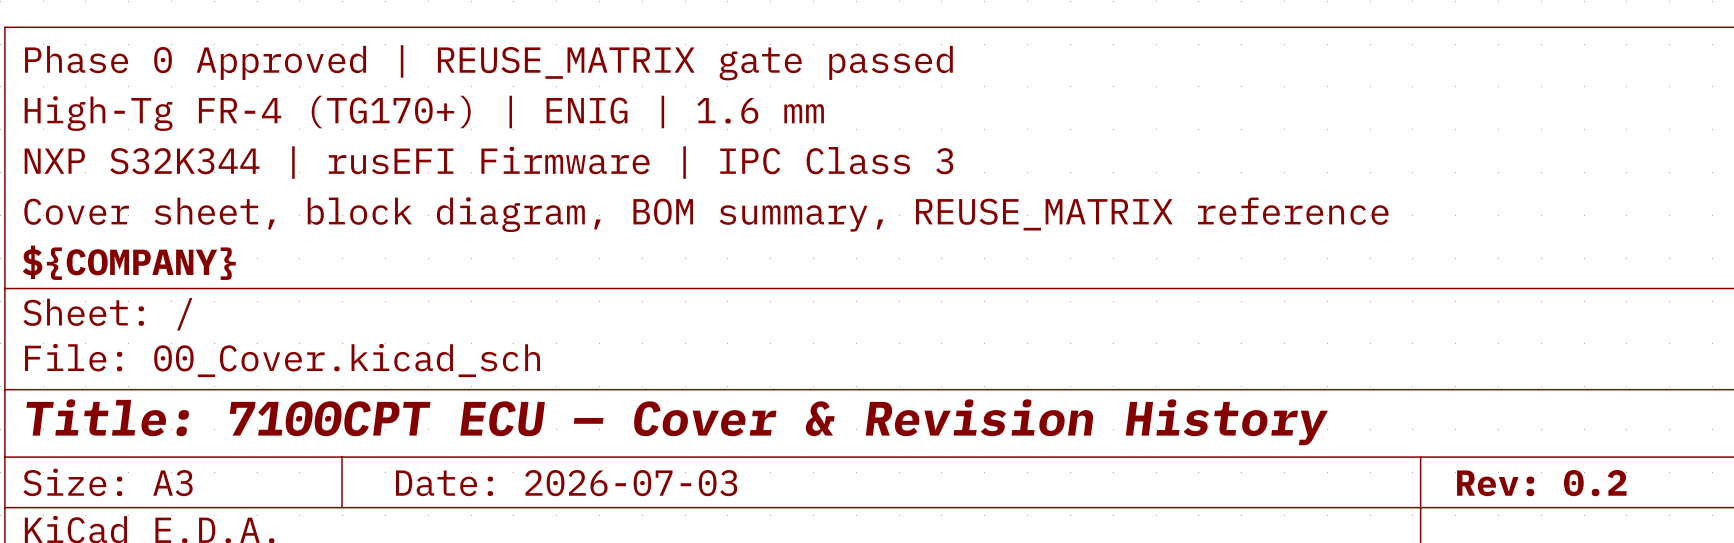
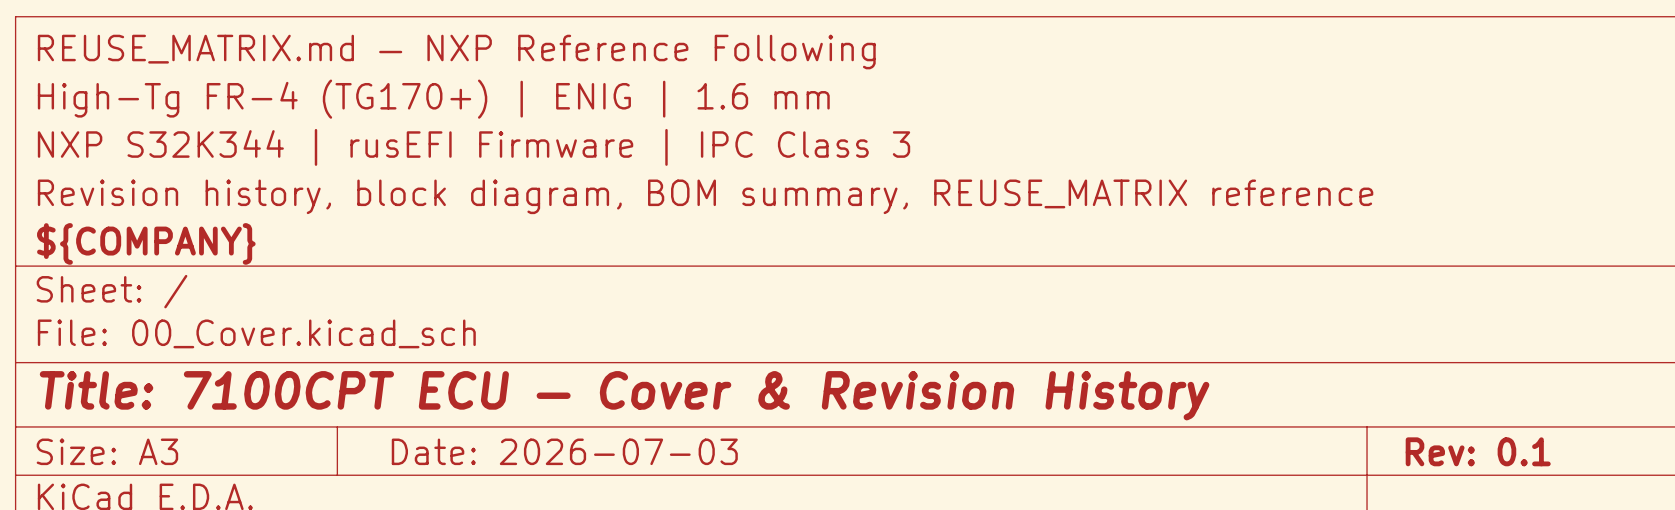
title block: Phase 0 Approved | REUSE_MATRIX gate passed (488, 62) -> REUSE_MATRIX.md — NXP Reference Following (456, 52)
title block: Cover sheet, block diagram, BOM summary, REUSE_MATRIX reference (706, 214) -> Revision history, block diagram, BOM summary, REUSE_MATRIX reference (705, 196)
title block: Rev: 0.2 (1541, 483) -> Rev: 0.1 (1478, 451)

